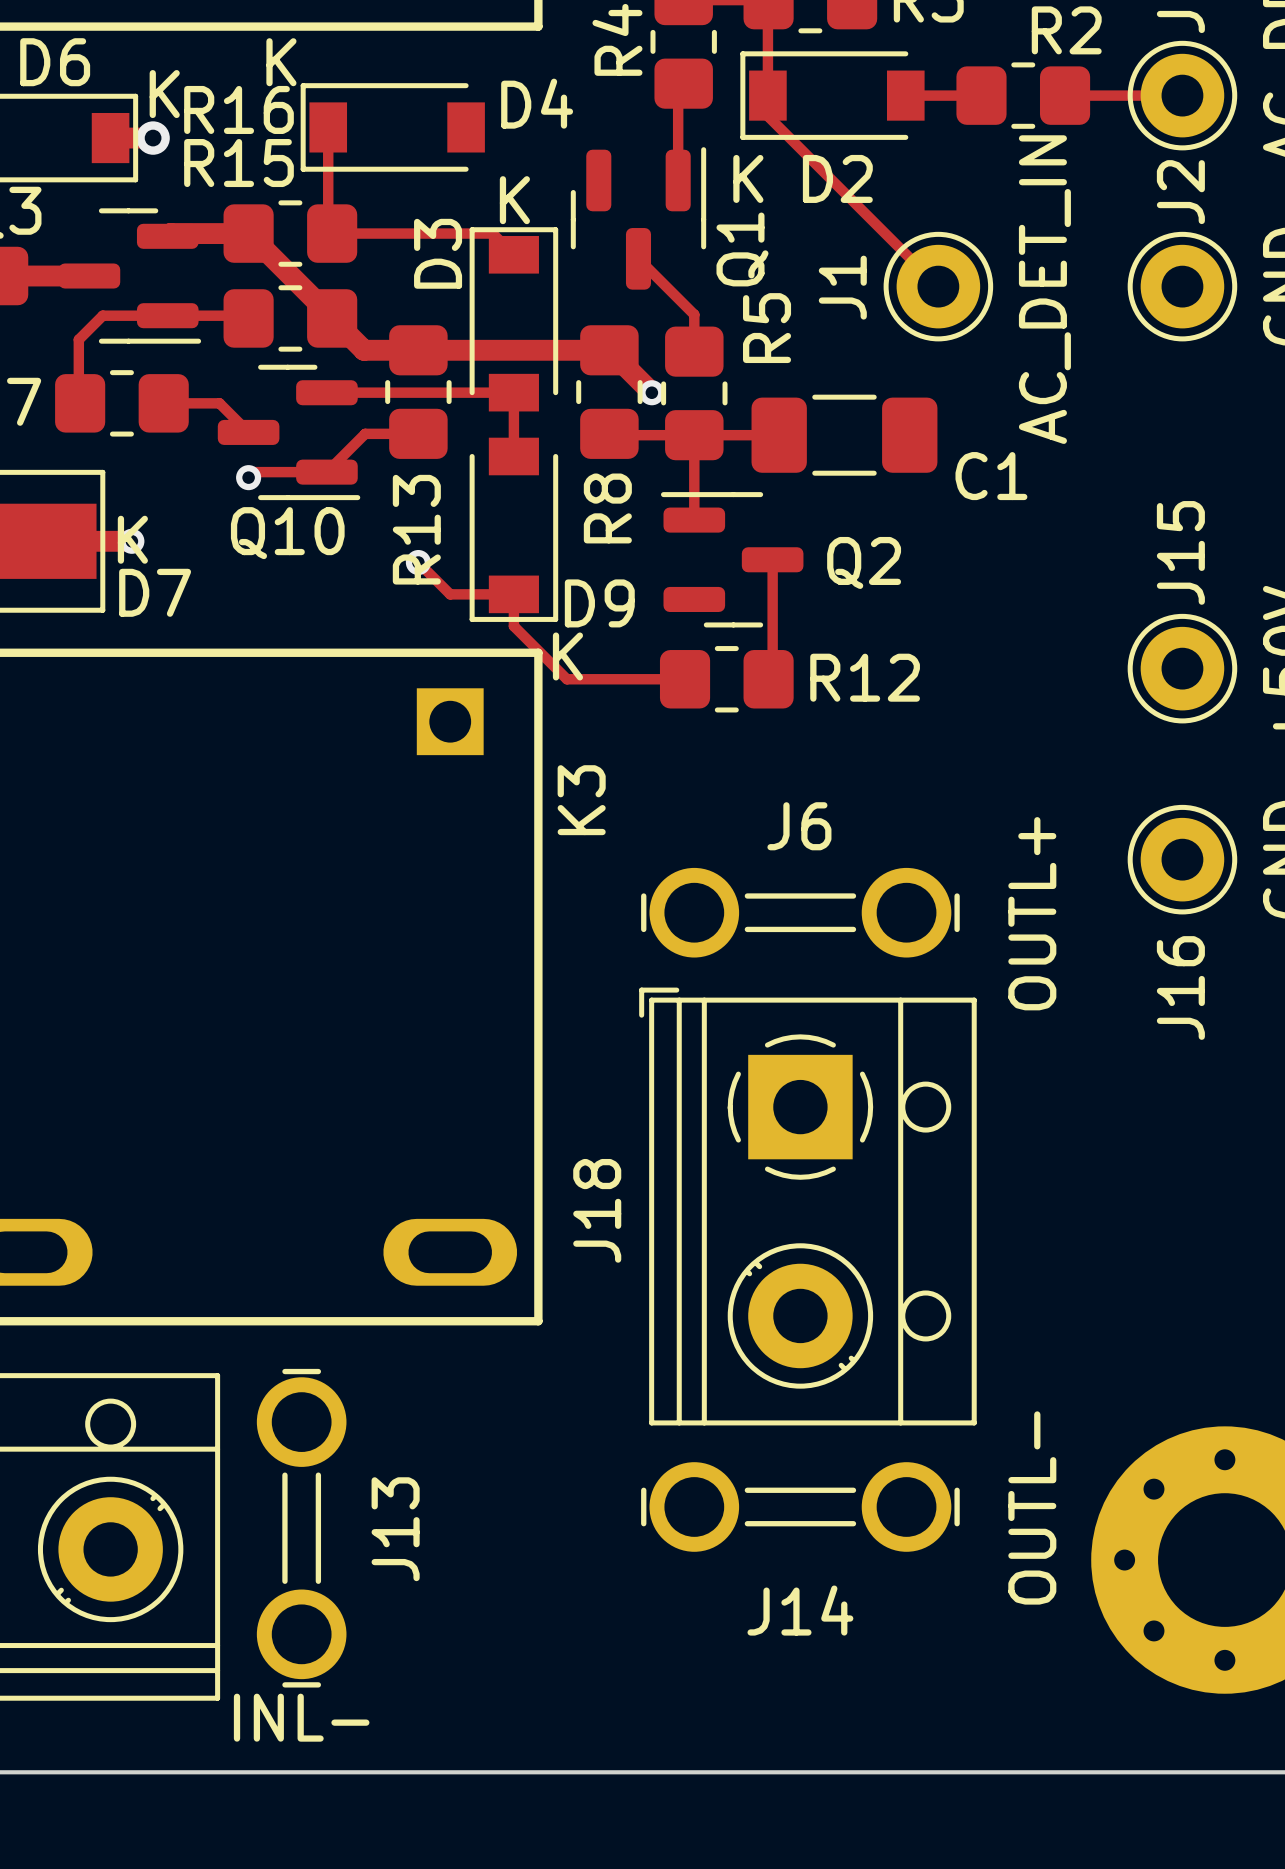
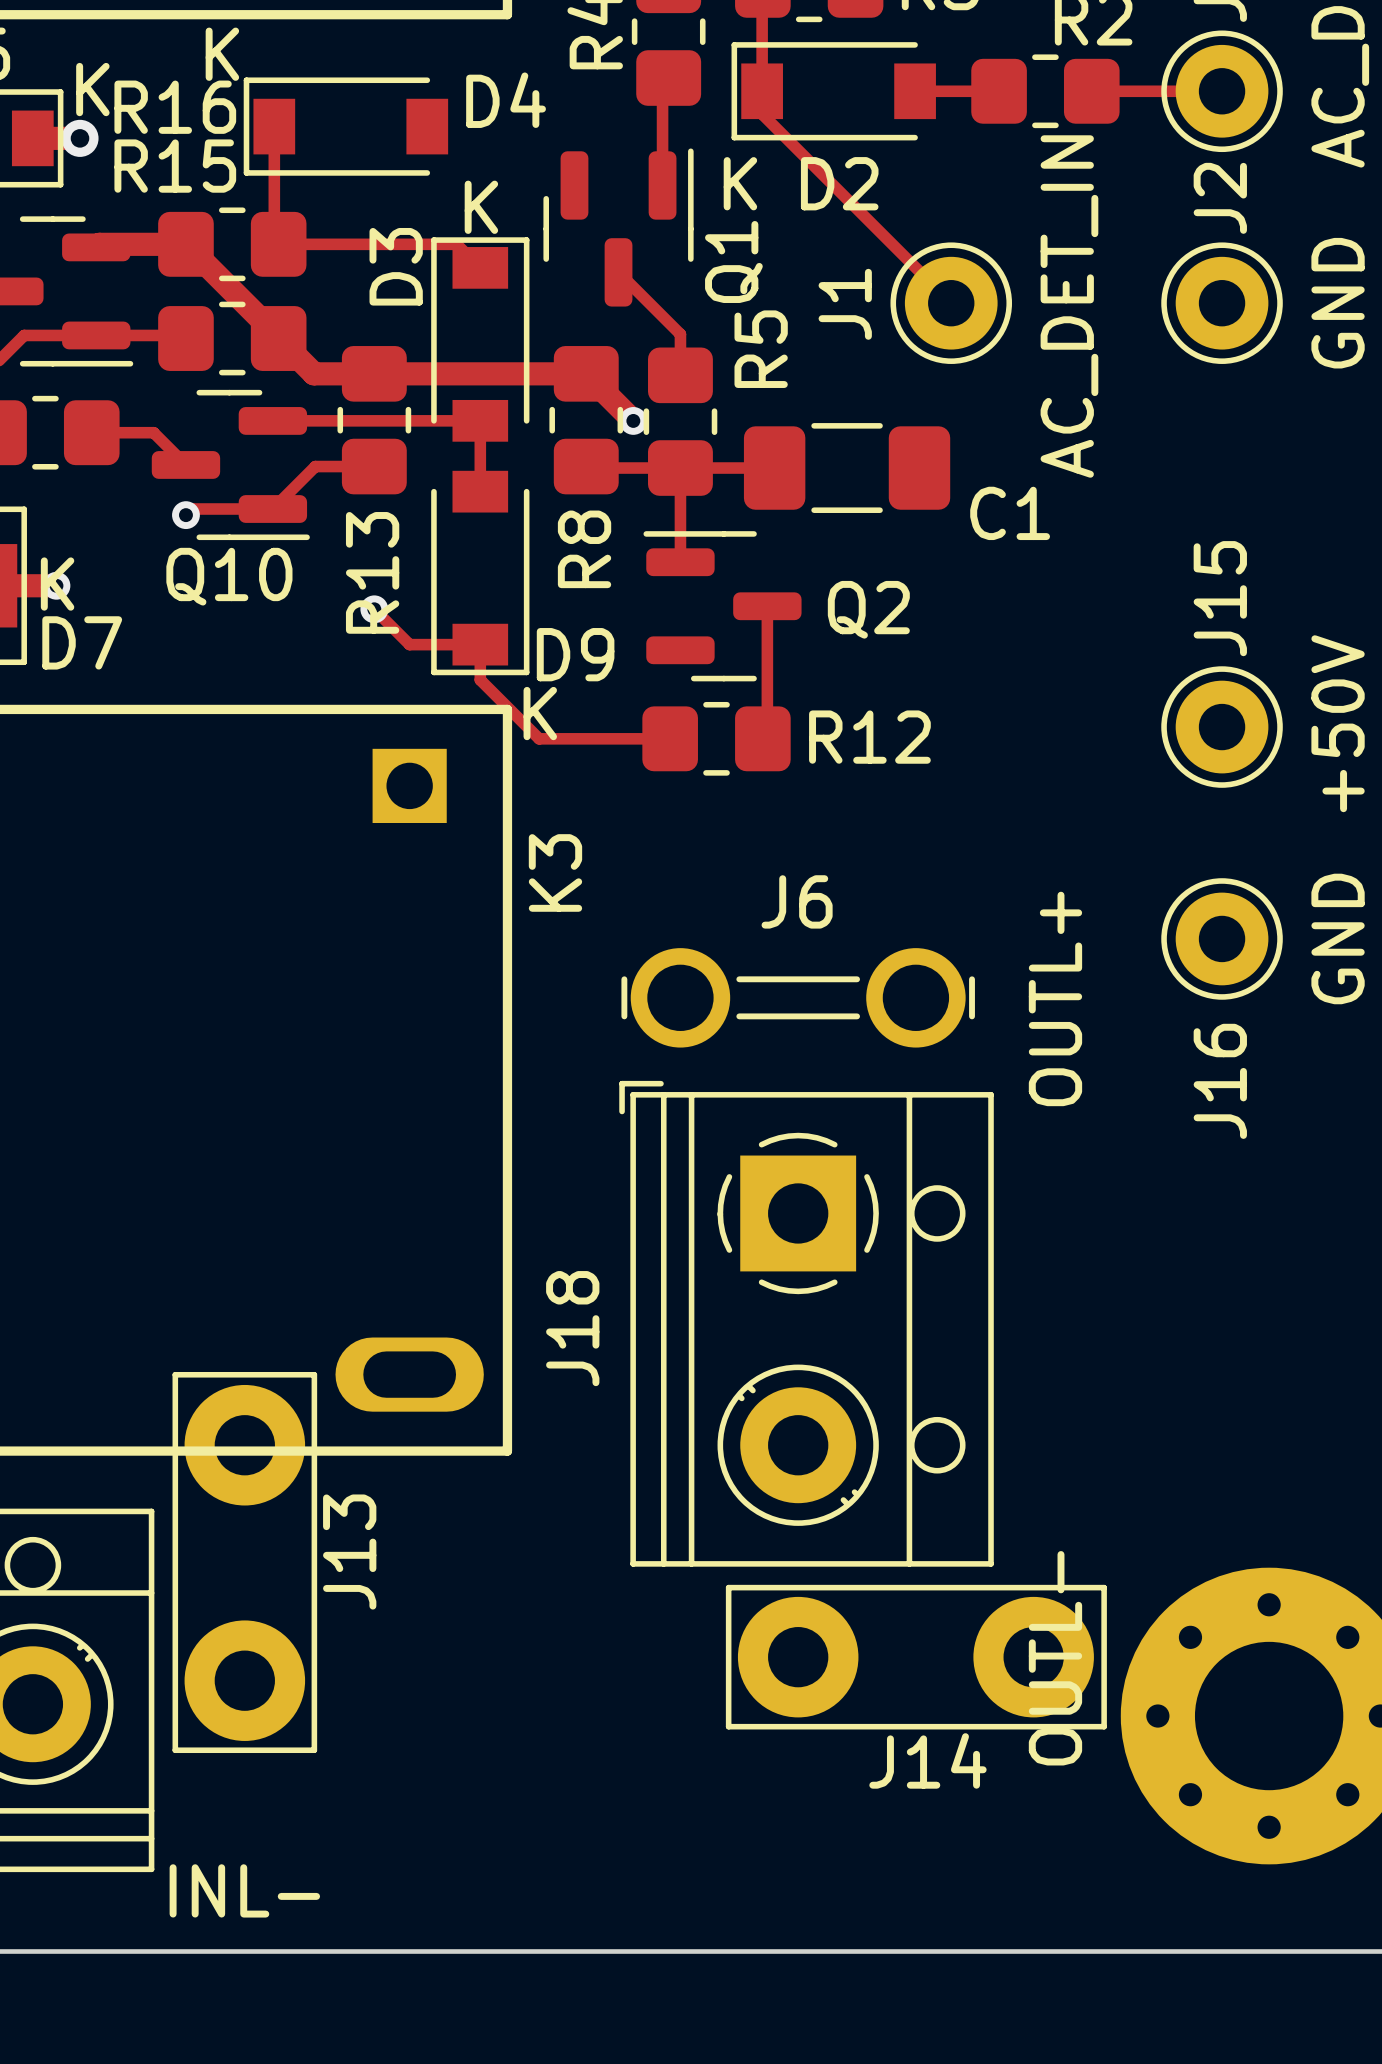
J13 footprint: [256, 1368, 347, 1688] -> [172, 1372, 318, 1754]
J14 footprint: [641, 1462, 960, 1552] -> [725, 1584, 1107, 1730]

